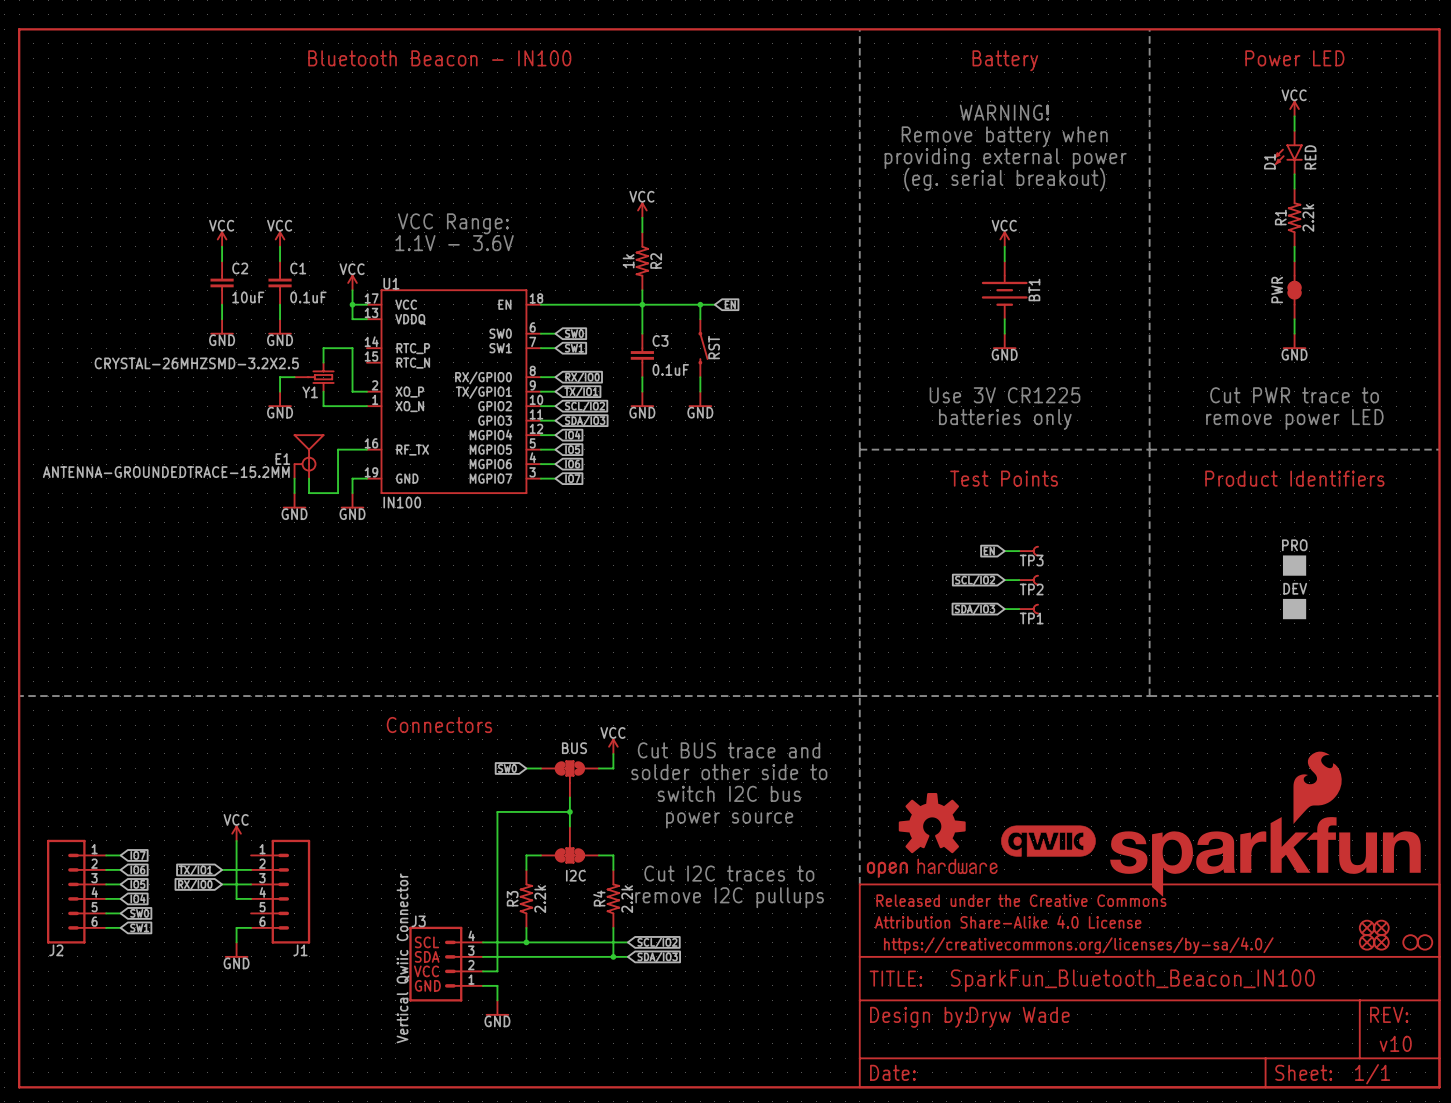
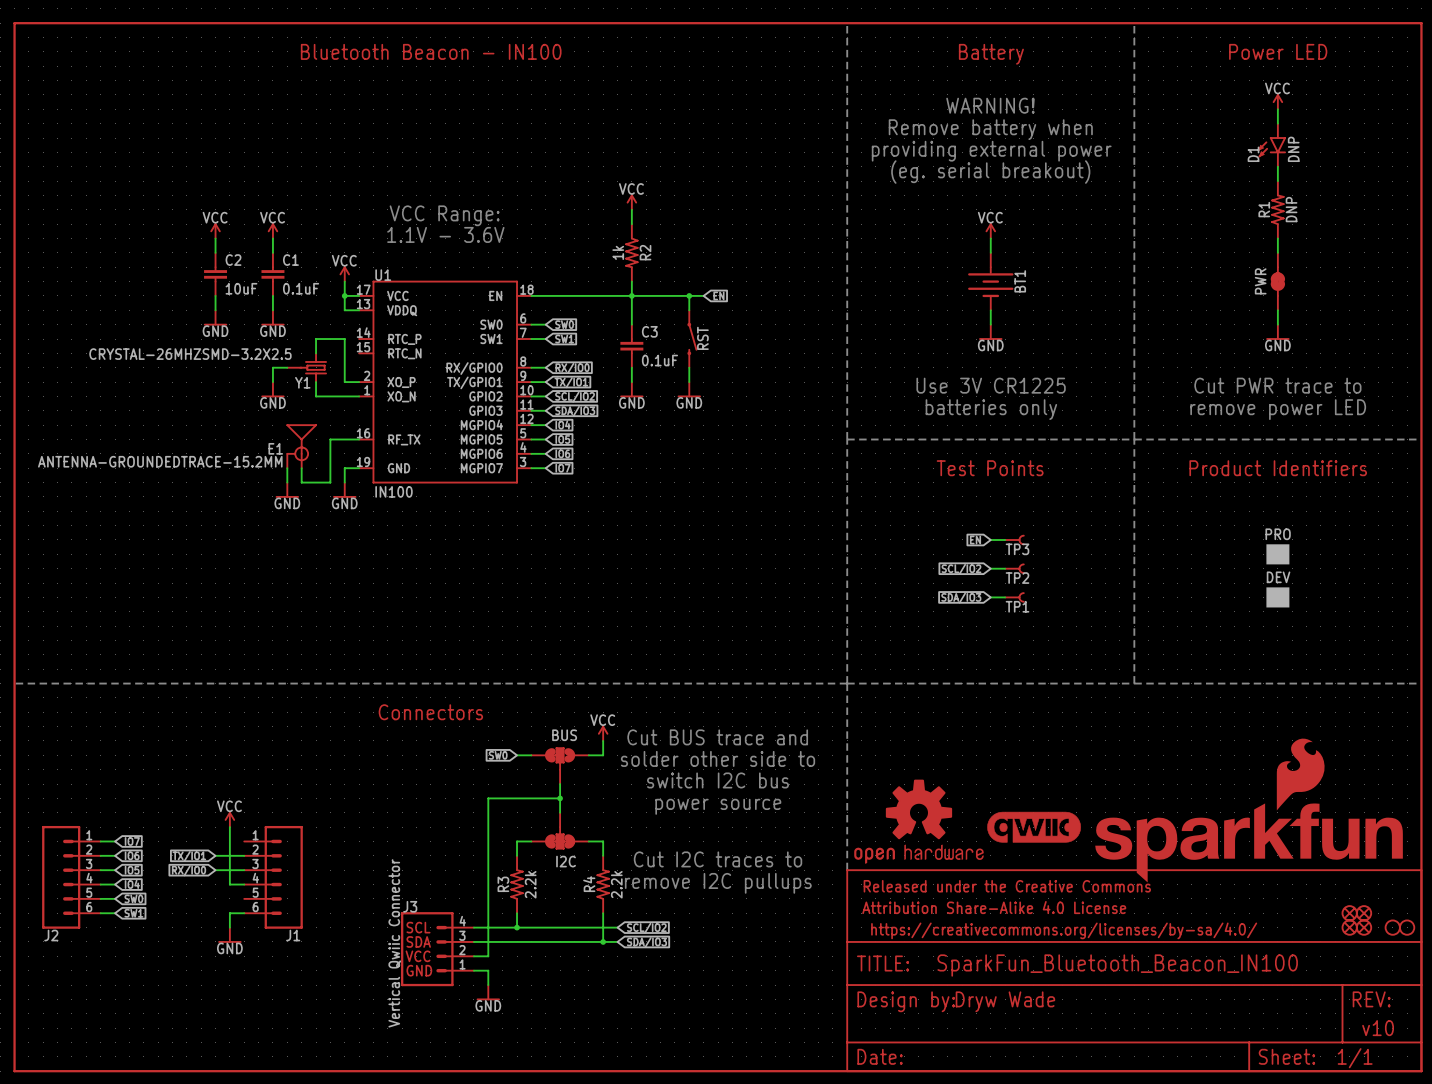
D1 value: RED (1310, 157) -> DNP (1293, 149)
R1 value: 2.2k (1308, 217) -> DNP (1291, 209)

